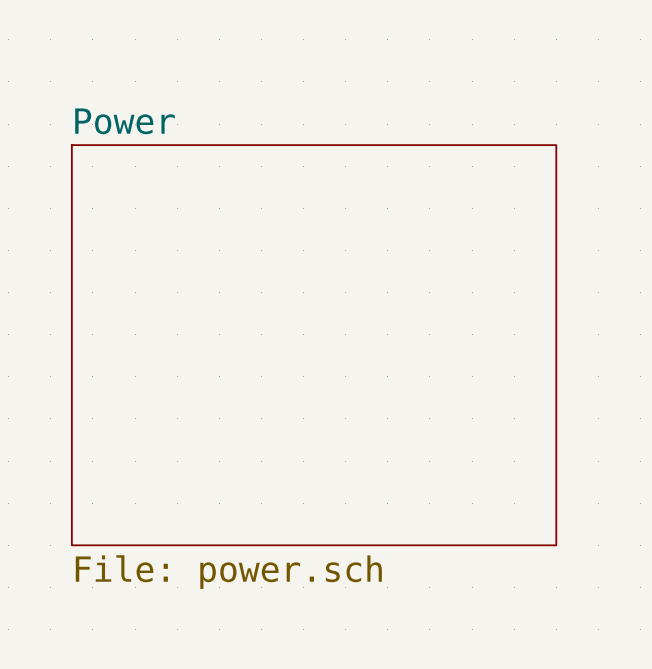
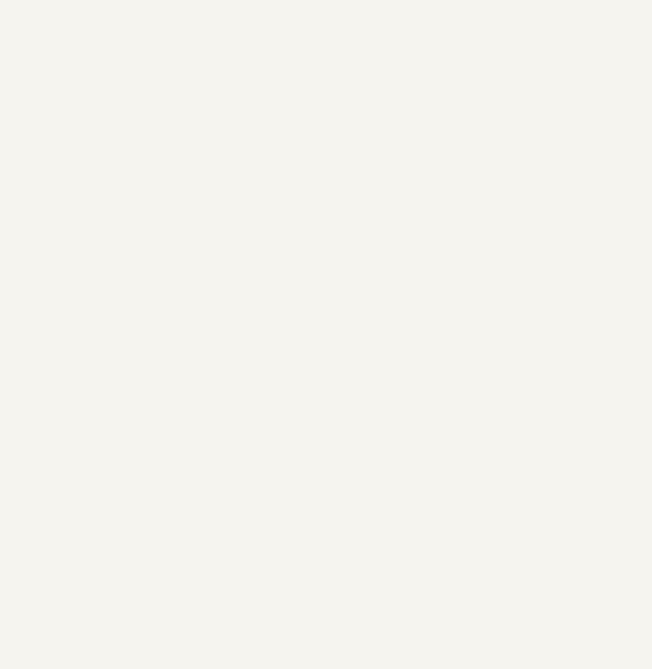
sheet Power: File: power.sch (314, 345) -> none

